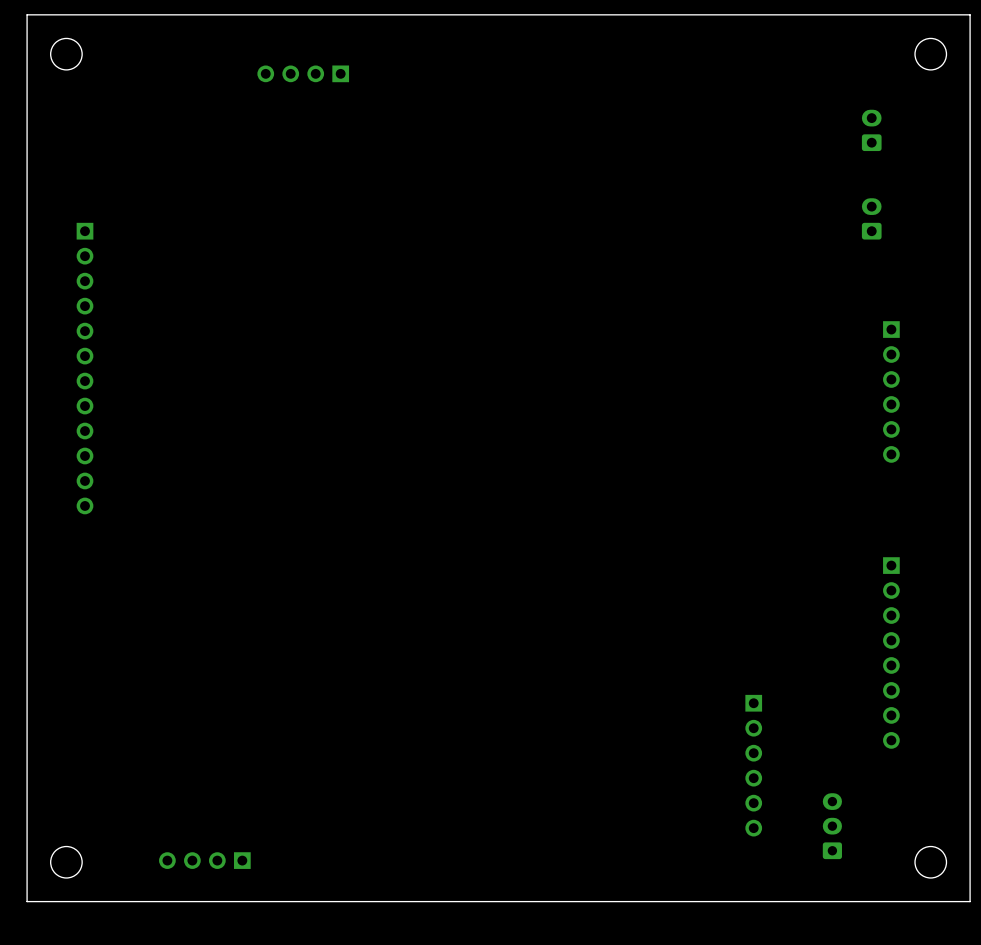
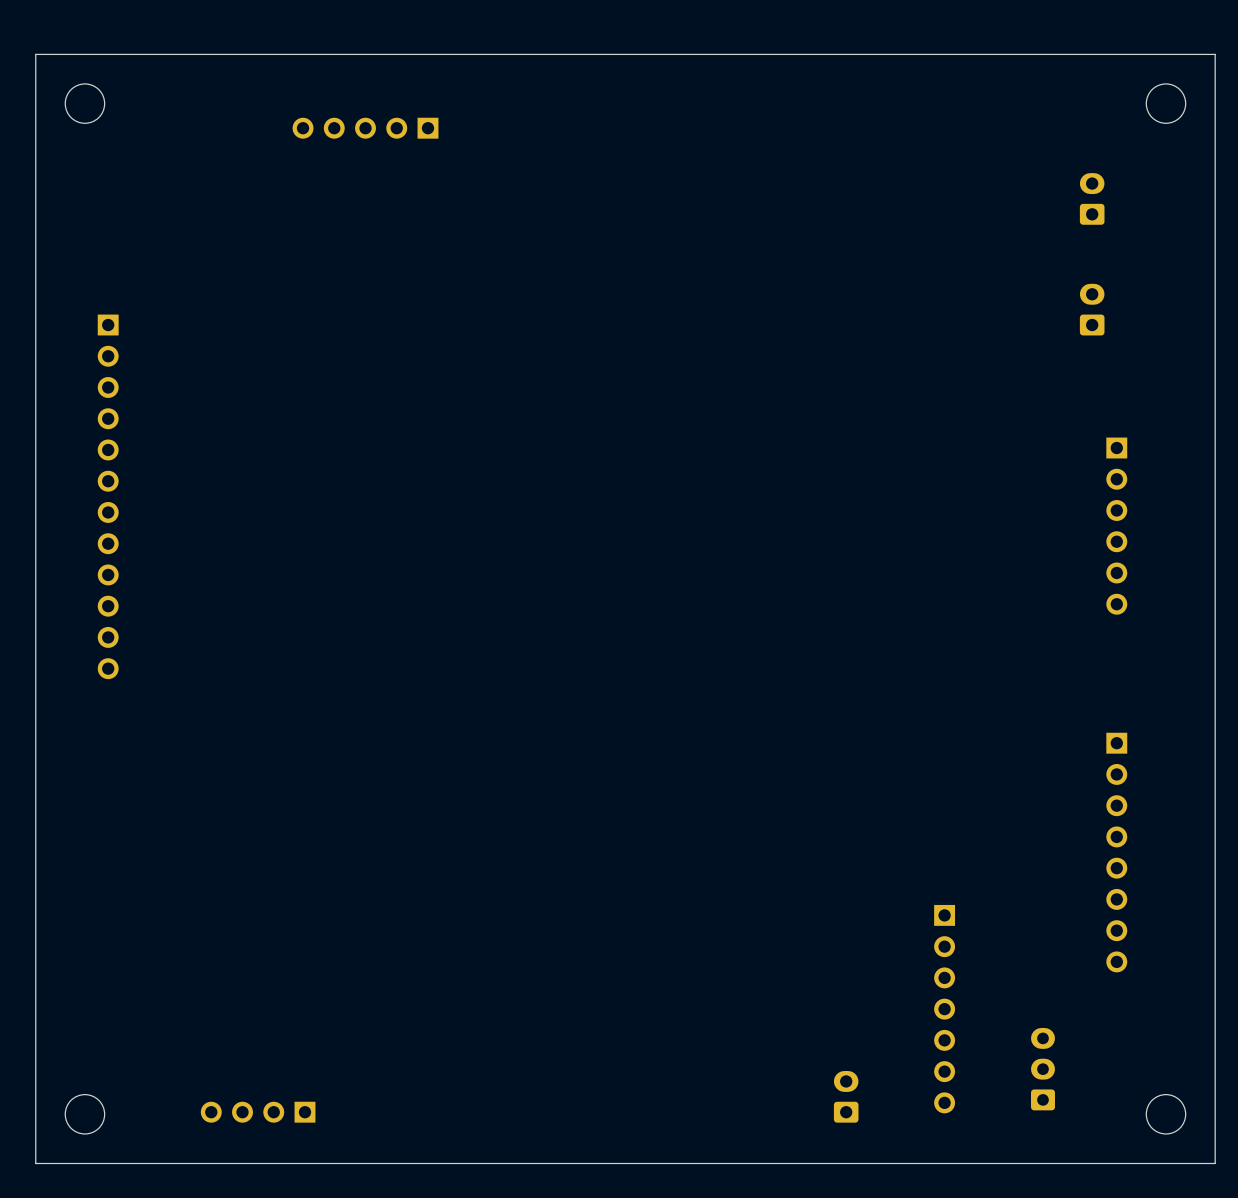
part: none -> (365, 128)
part: none -> (944, 1009)
part: none -> (846, 1096)

